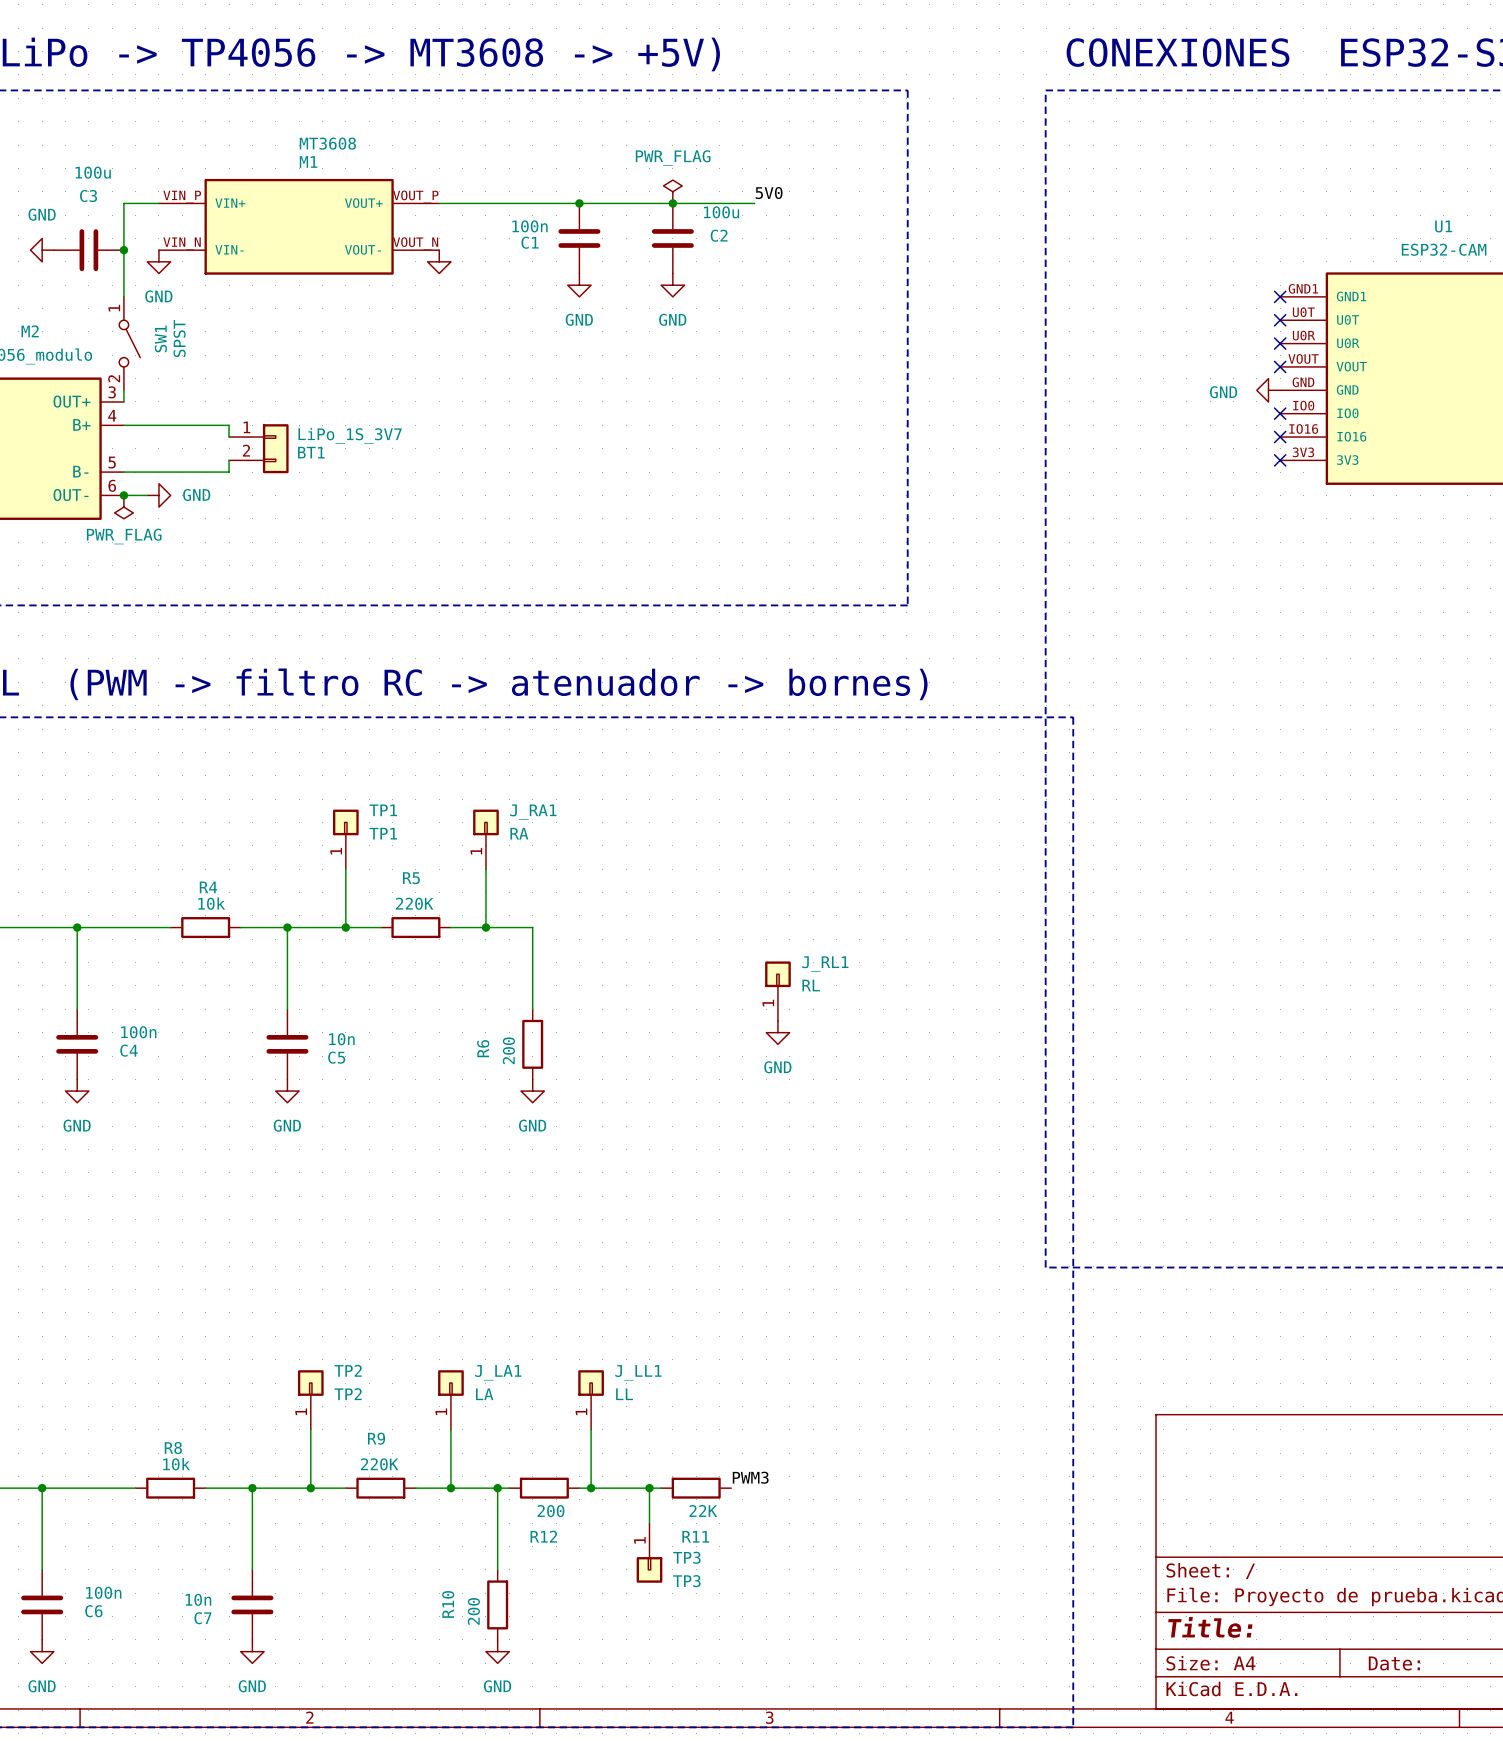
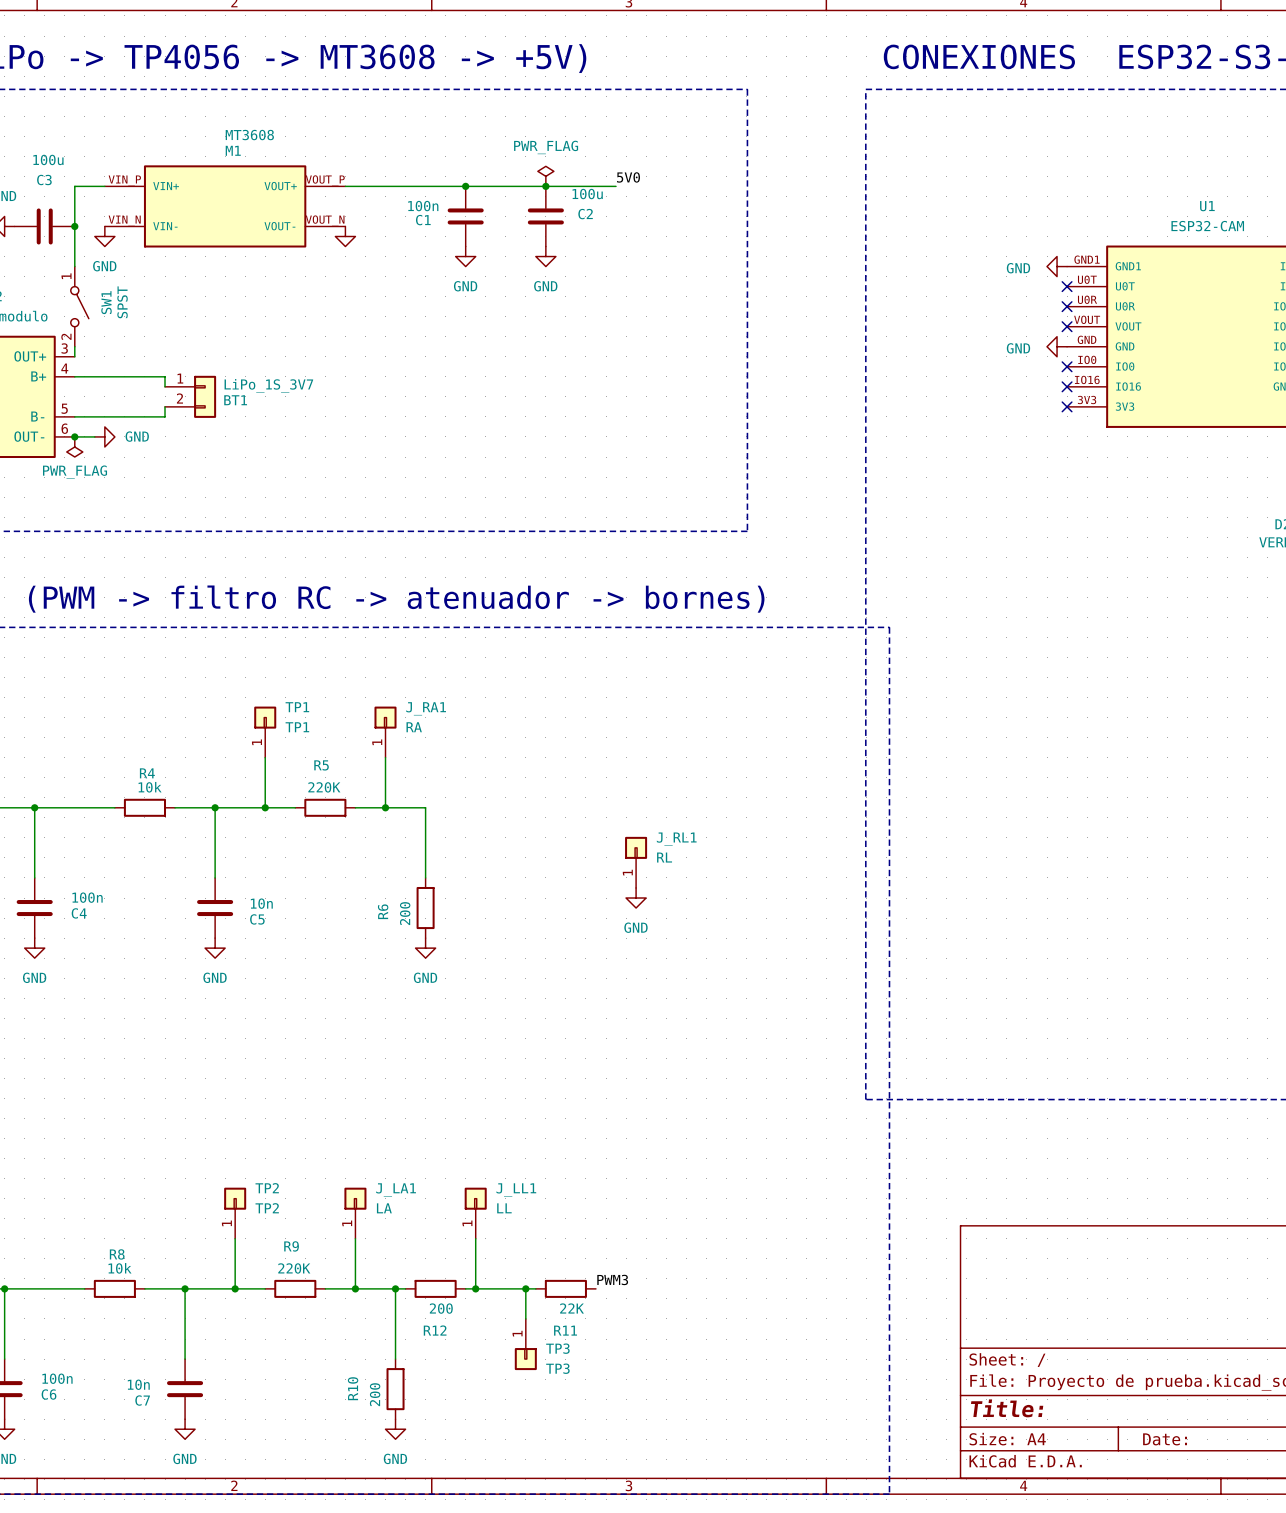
power symbol: none -> GND (1057, 266)
no-connect mark: (1280, 296) -> none

